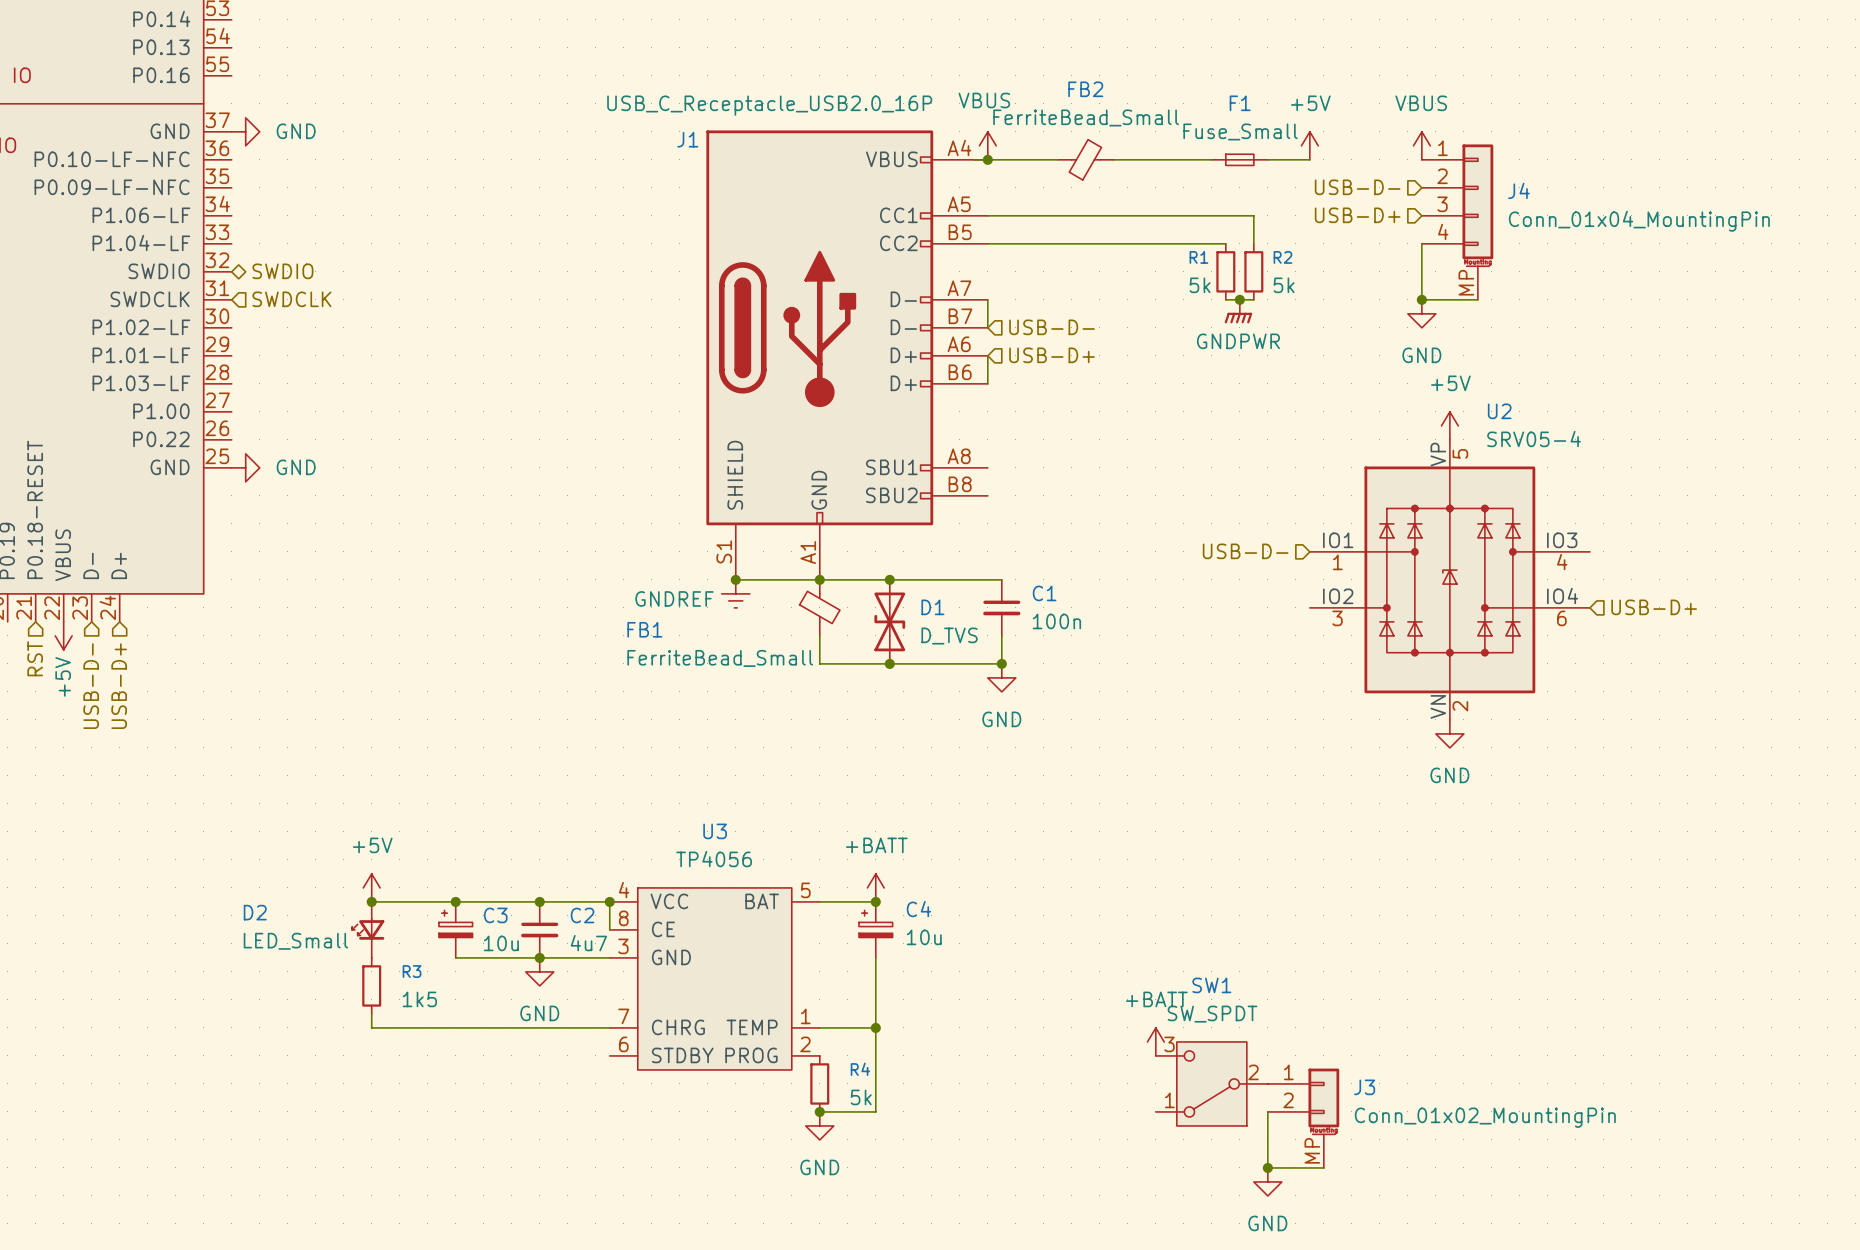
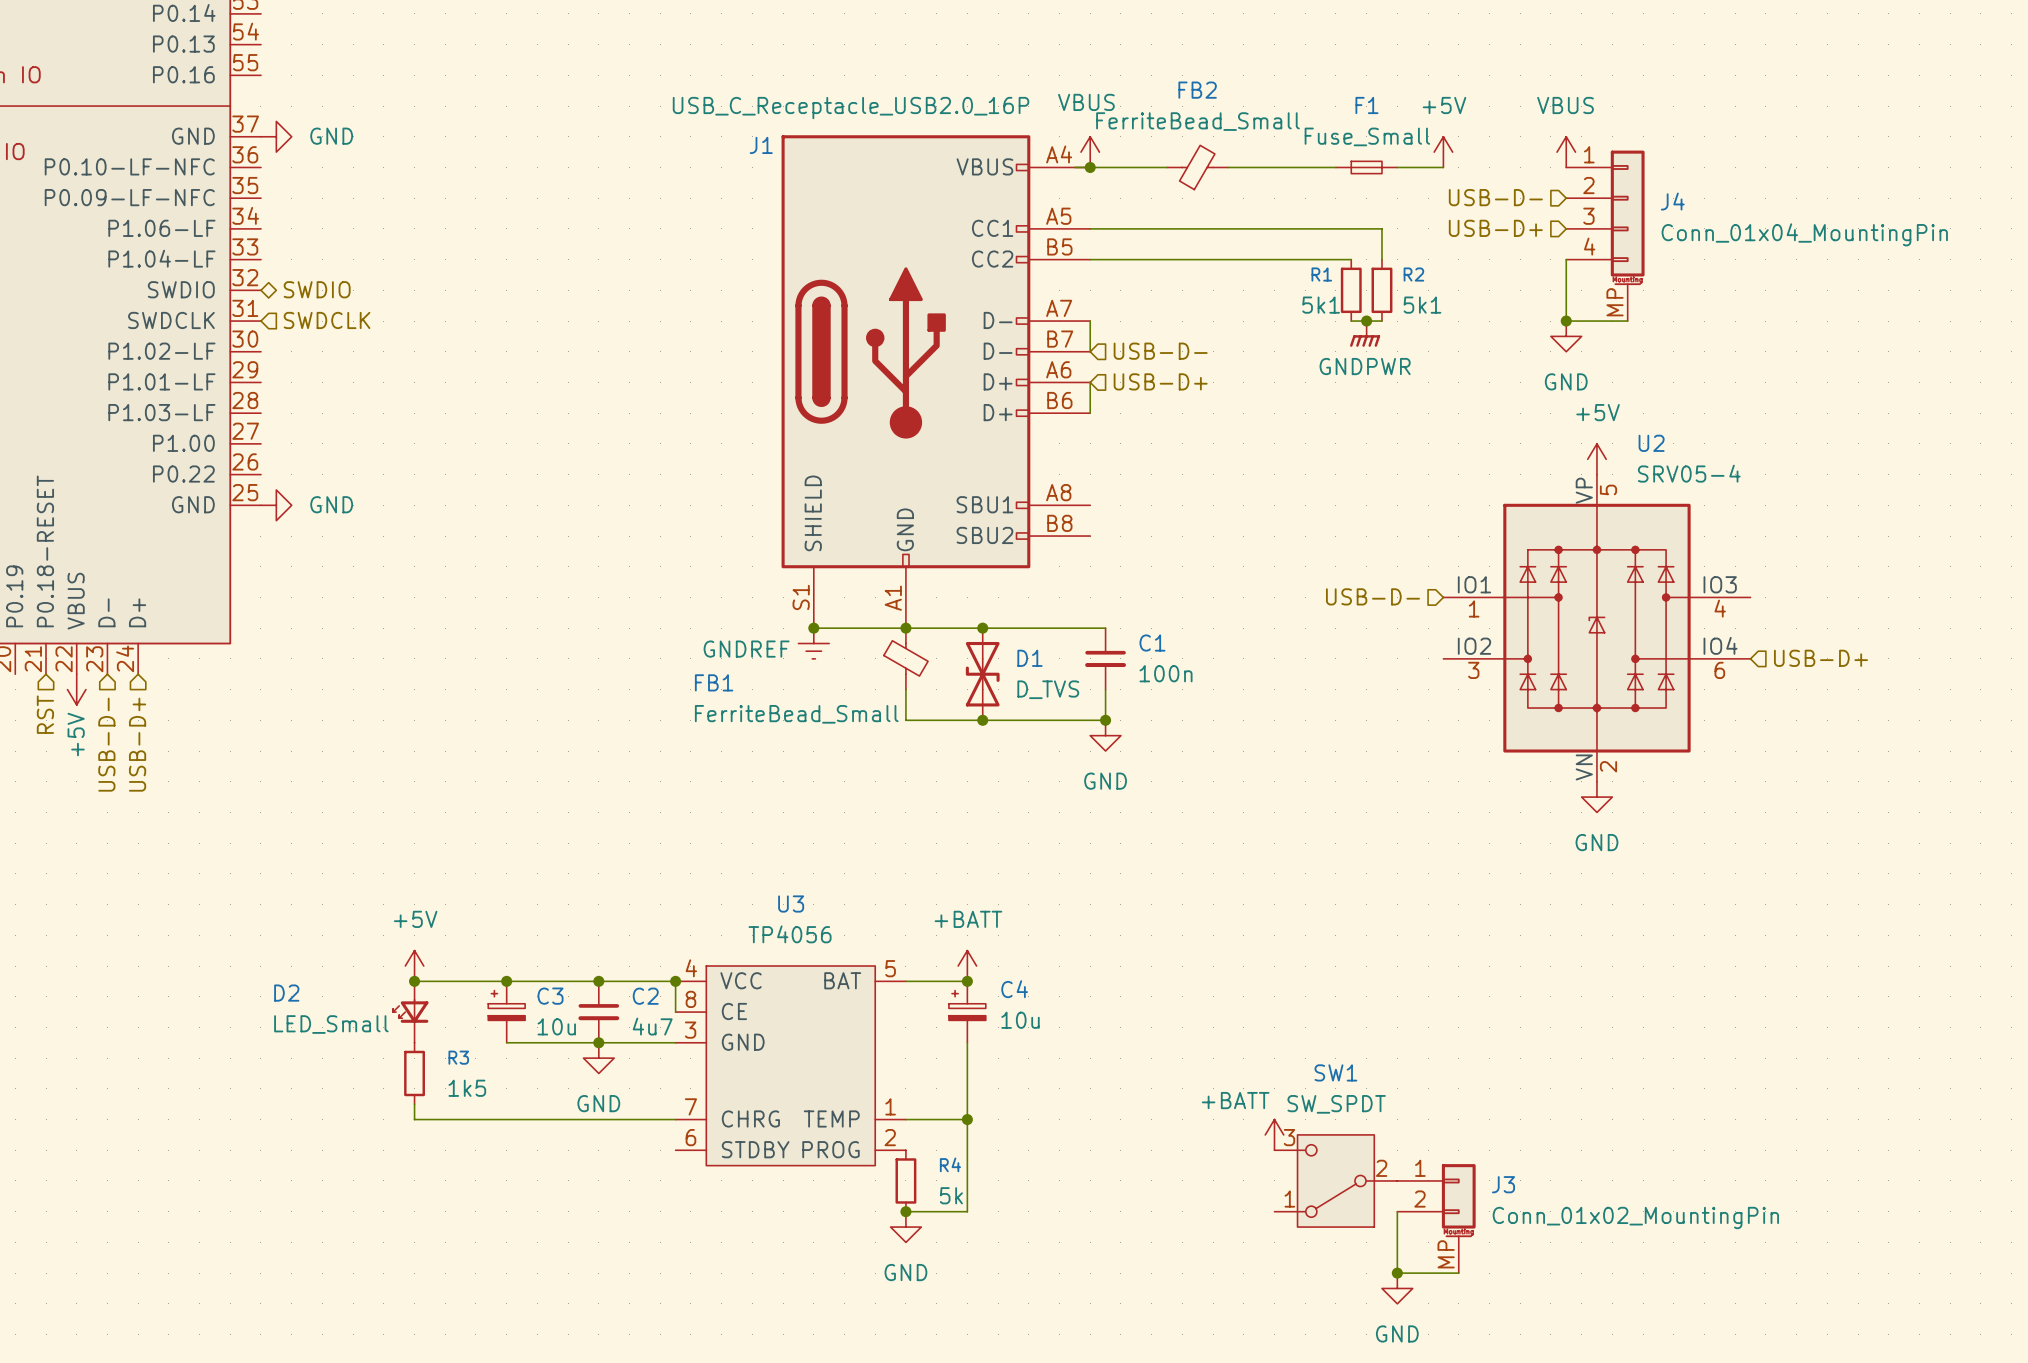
R1 value: 5k (1200, 285) -> 5k1 (1321, 305)
R2 value: 5k (1284, 285) -> 5k1 (1422, 305)
power symbol text position: +BATT (1156, 999) -> +BATT (1235, 1100)

